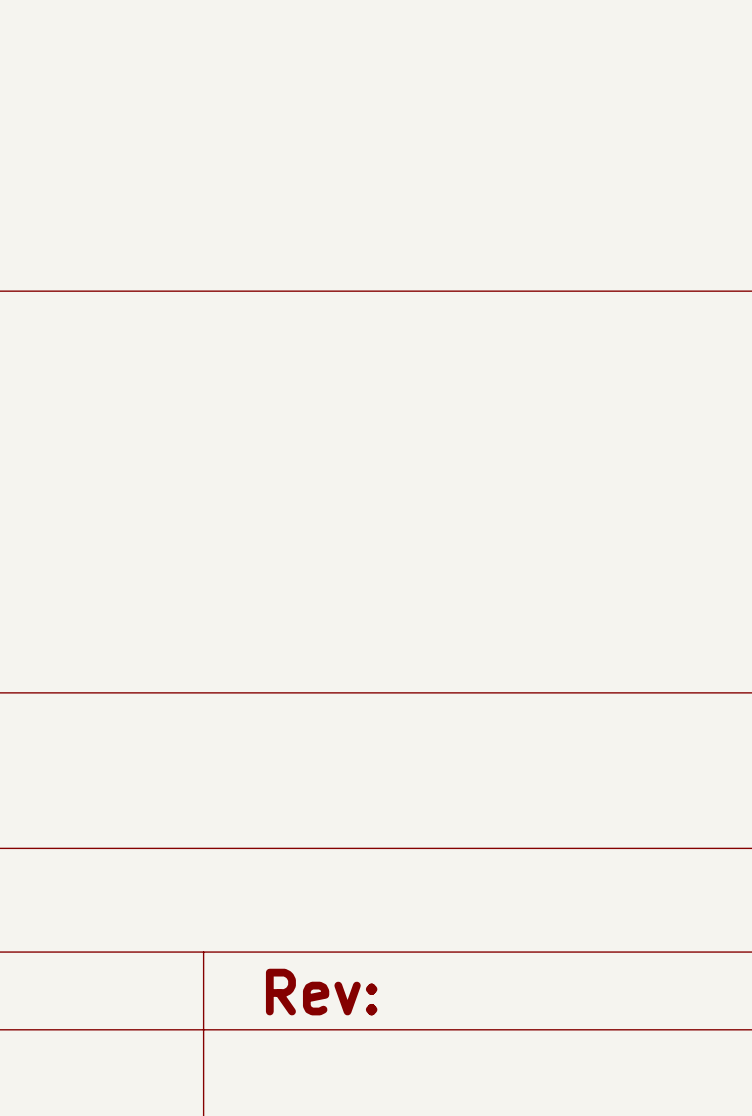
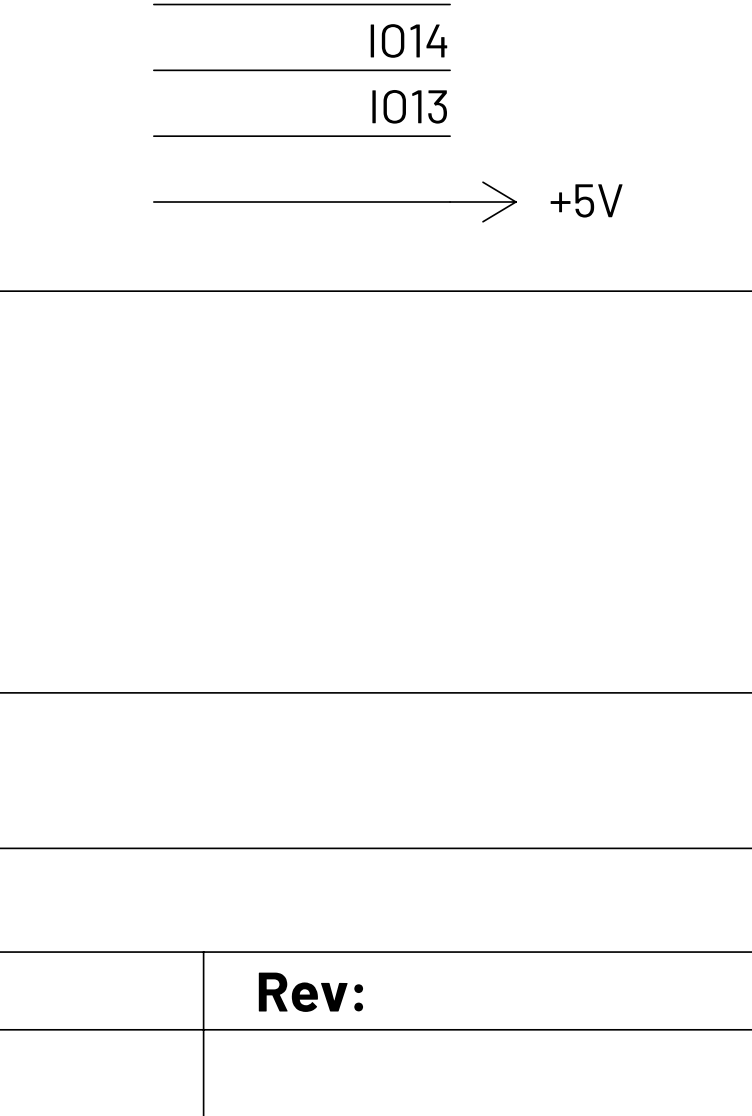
wire: none -> (153, 4) (450, 4)
label: none -> IO14 (408, 40)
wire: none -> (153, 70) (450, 70)
label: none -> IO13 (409, 106)
wire: none -> (153, 136) (450, 136)
wire: none -> (153, 202) (450, 202)
power symbol: none -> +5V (483, 202)

